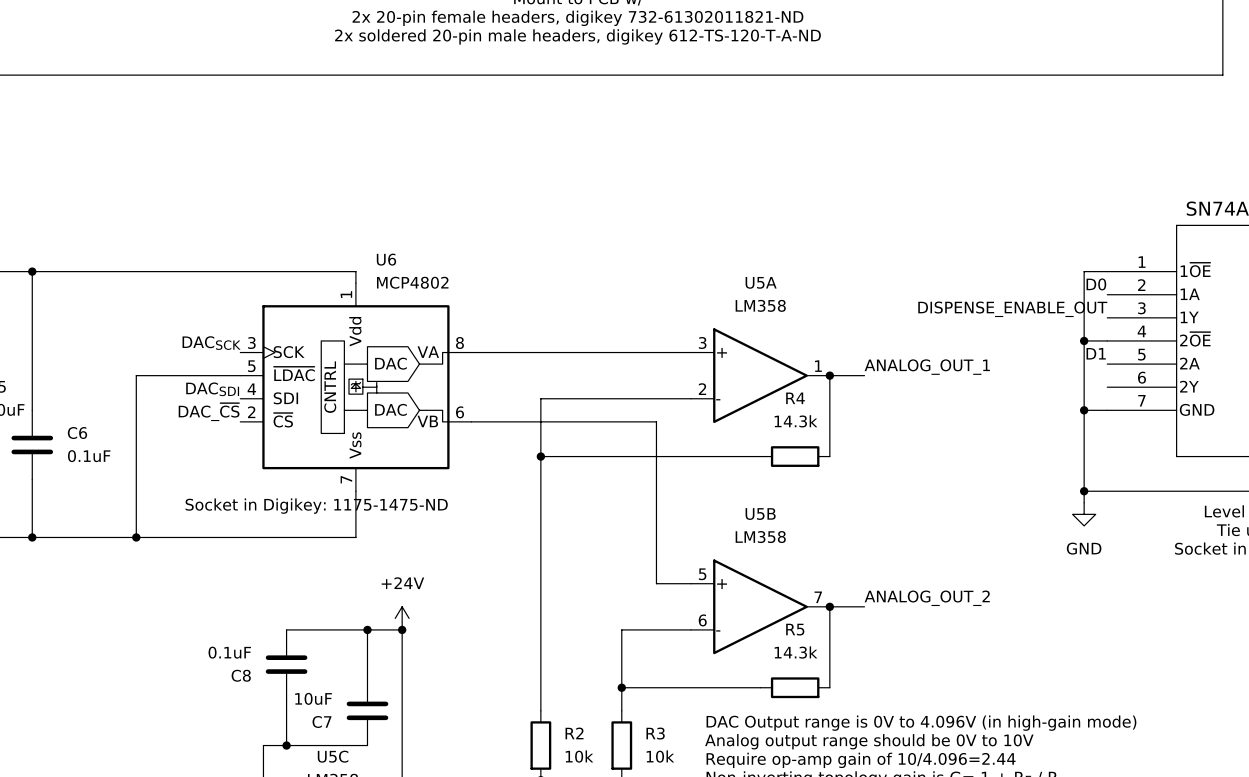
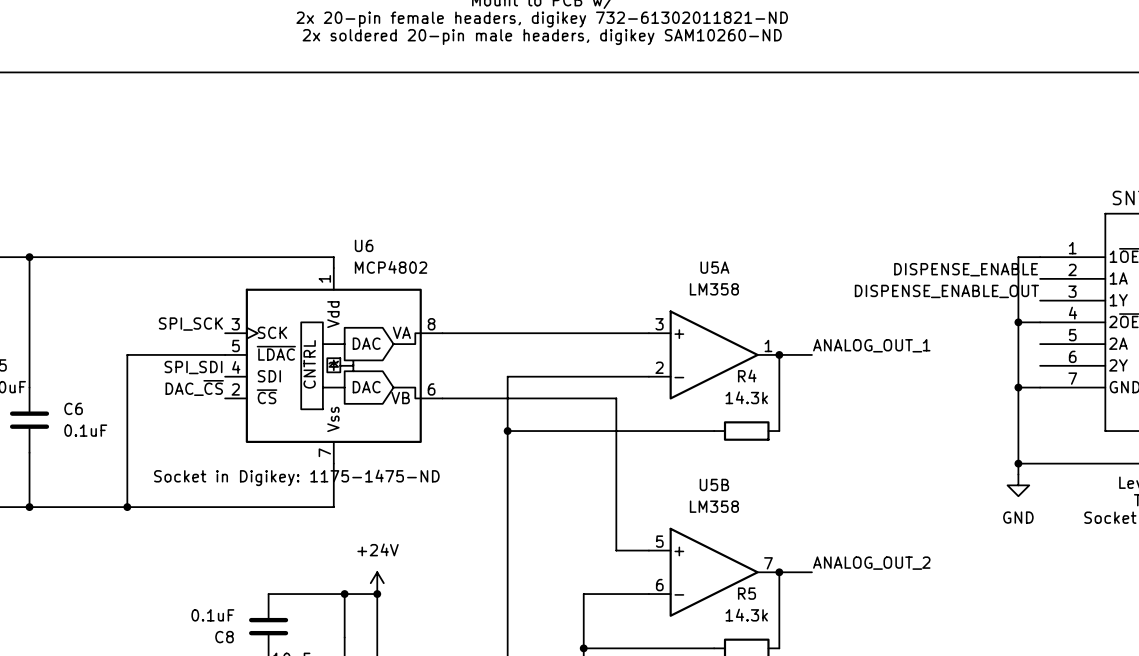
text: 2x soldered 20-pin male headers, digikey 612-TS-120-T-A-ND (577, 36) -> 2x soldered 20-pin male headers, digikey SAM10260-ND (542, 37)
label: D0 (1096, 284) -> DISPENSE_ENABLE (966, 269)
label: DACSCK (211, 343) -> SPI_SCK (190, 324)
label: D1 (1096, 353) -> none
label: DACSDI (212, 389) -> SPI_SDI (193, 367)

